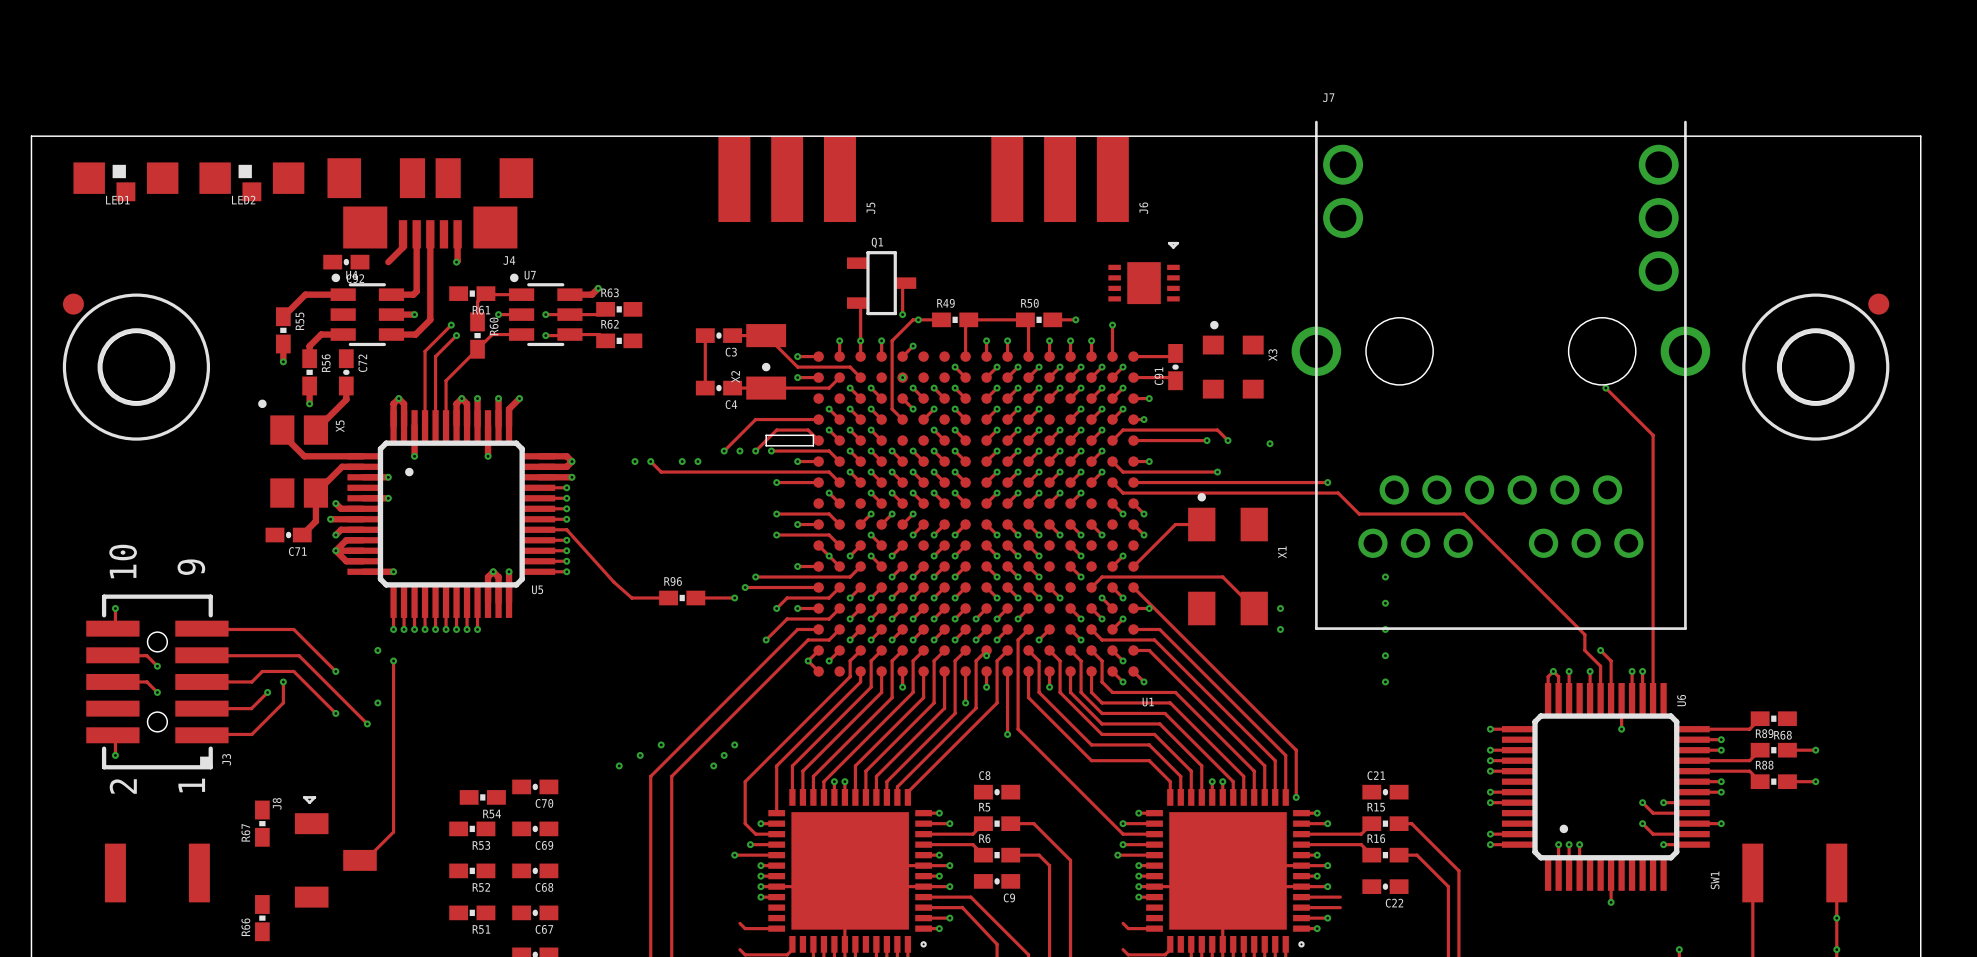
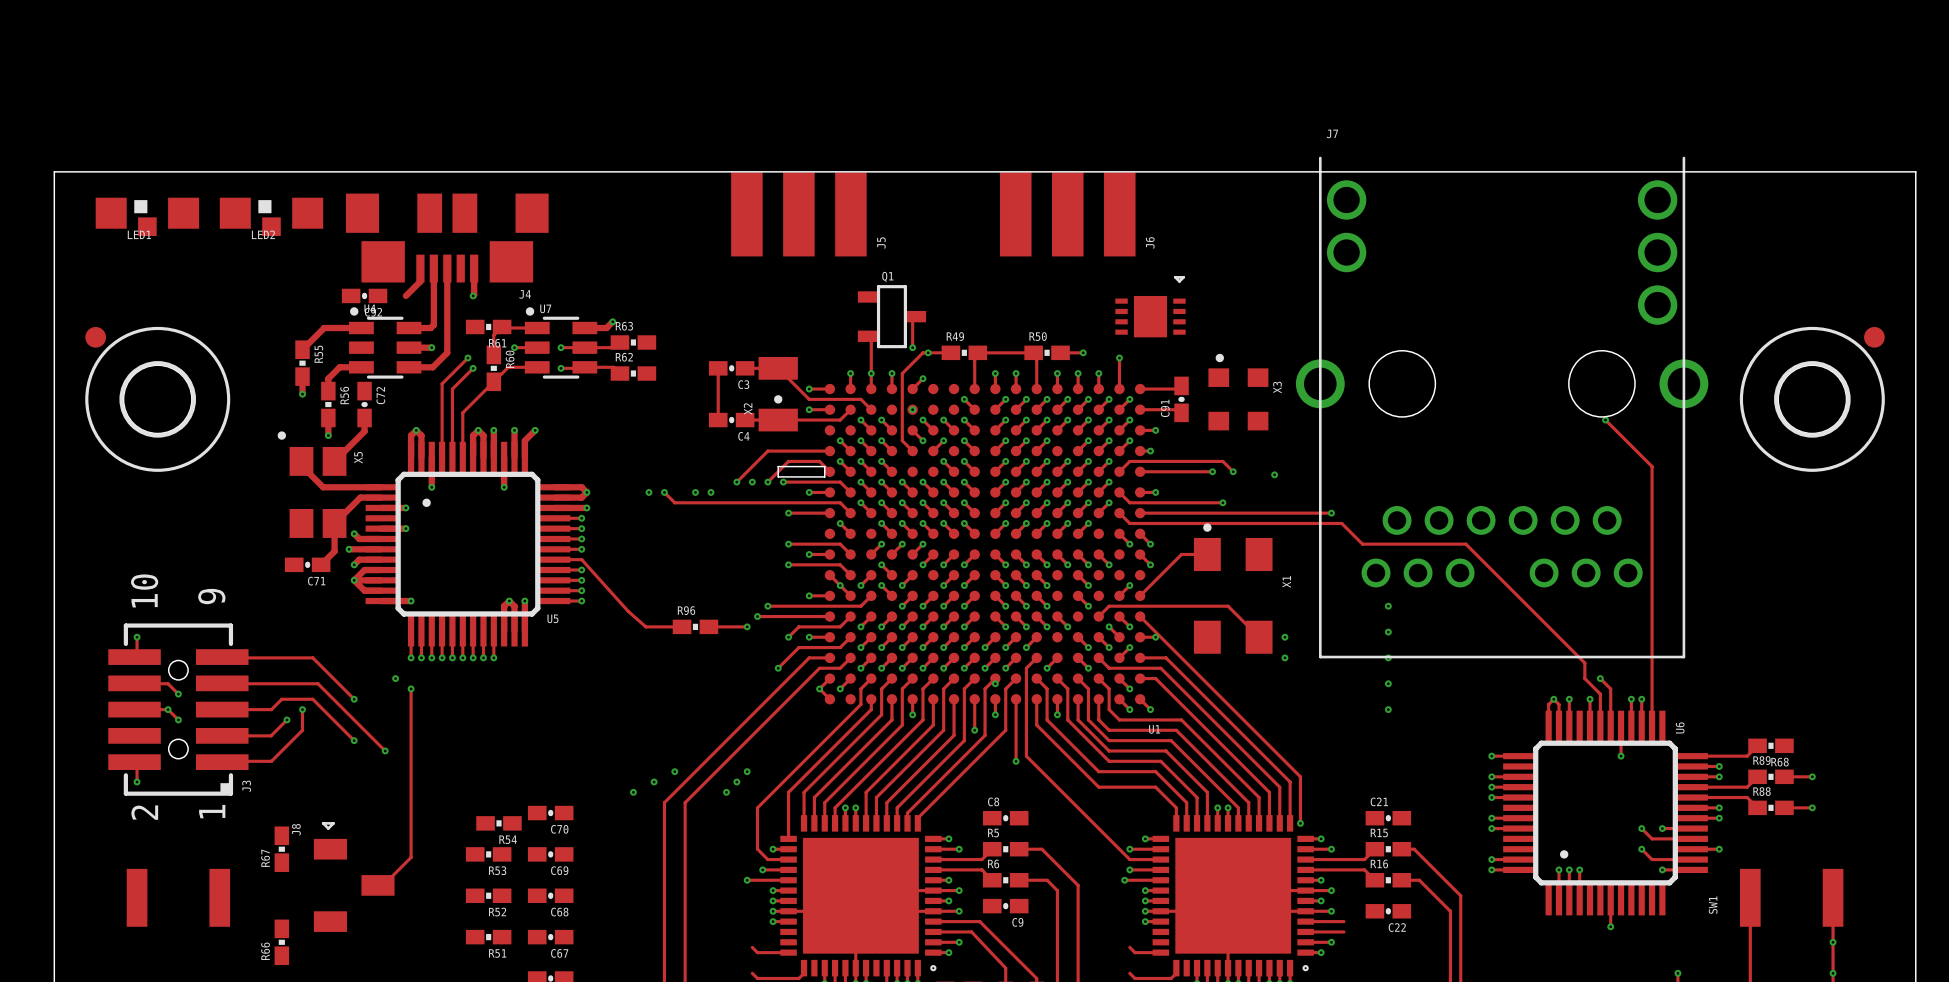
via: none -> (168, 709)
via: (377, 702) -> none

